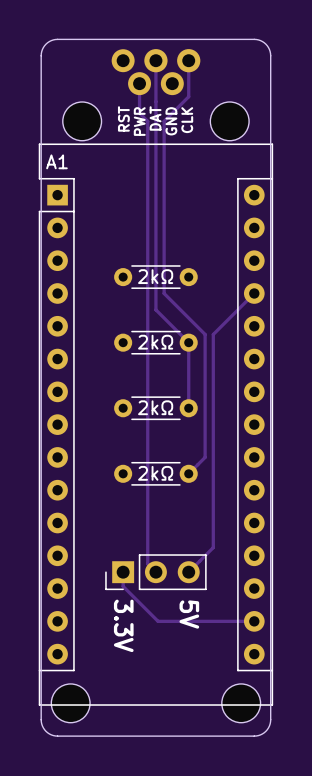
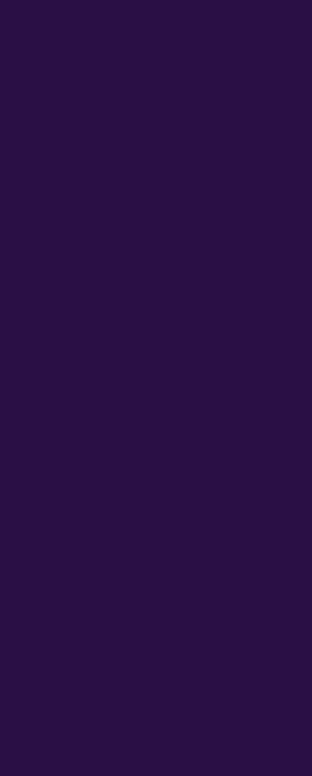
board edge: (254, 39) (57, 39) (47, 42) (41, 51) (41, 719) (44, 729) (53, 735) (254, 736) (264, 732) (270, 723) (270, 55) (265, 44) (254, 39) -> none
track: (155, 60) (155, 309) (188, 342) (188, 408) -> none
track: (188, 60) (188, 96) (164, 121) (164, 293) (205, 334) (205, 457) (188, 473) -> none
part: (156, 72) -> none
track: (139, 83) (139, 113) (147, 121) (147, 563) (155, 572) -> none
text: RST (123, 118) -> none
text: DAT (155, 118) -> none
text: CLK (187, 120) -> none
part: (82, 121) -> none
text: PWR (139, 121) -> none
text: GND (171, 121) -> none
part: (229, 121) -> none
2kΩ: (155, 277) -> none
track: (254, 293) (213, 334) (213, 547) (188, 572) -> none
2kΩ: (155, 342) -> none
2kΩ: (155, 408) -> none
A1: (155, 424) -> none
2kΩ: (155, 473) -> none
track: (123, 572) (123, 586) (158, 621) (254, 621) -> none
part: (155, 572) -> none
text: 5V (189, 614) -> none
text: 3.3V (123, 625) -> none
part: (70, 703) -> none
part: (241, 703) -> none

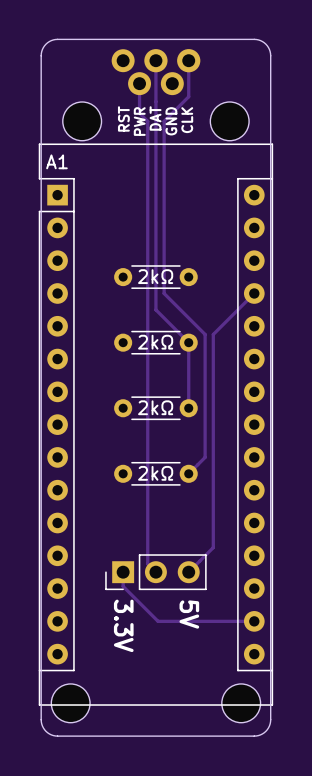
board edge: none -> (254, 39) (57, 39) (47, 42) (41, 51) (41, 719) (44, 729) (53, 735) (254, 736) (264, 732) (270, 723) (270, 55) (265, 44) (254, 39)
track: none -> (155, 60) (155, 309) (188, 342) (188, 408)
track: none -> (188, 60) (188, 96) (164, 121) (164, 293) (205, 334) (205, 457) (188, 473)
part: none -> (156, 72)
track: none -> (139, 83) (139, 113) (147, 121) (147, 563) (155, 572)
text: none -> RST (123, 118)
text: none -> DAT (155, 118)
text: none -> CLK (187, 120)
part: none -> (82, 121)
text: none -> PWR (139, 121)
text: none -> GND (171, 121)
part: none -> (229, 121)
2kΩ: none -> (155, 277)
track: none -> (254, 293) (213, 334) (213, 547) (188, 572)
2kΩ: none -> (155, 342)
2kΩ: none -> (155, 408)
A1: none -> (155, 424)
2kΩ: none -> (155, 473)
track: none -> (123, 572) (123, 586) (158, 621) (254, 621)
part: none -> (155, 572)
text: none -> 5V (189, 614)
text: none -> 3.3V (123, 625)
part: none -> (70, 703)
part: none -> (241, 703)

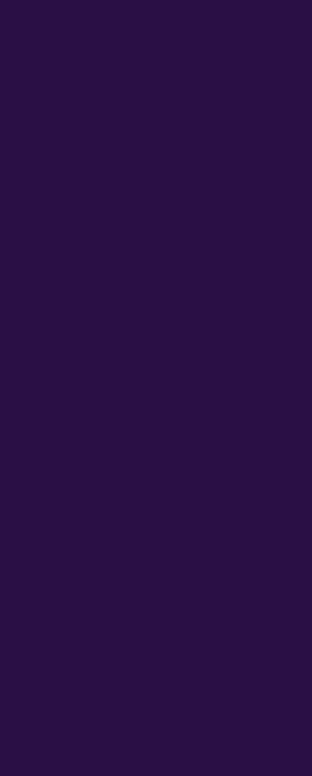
board edge: (254, 39) (57, 39) (47, 42) (41, 51) (41, 719) (44, 729) (53, 735) (254, 736) (264, 732) (270, 723) (270, 55) (265, 44) (254, 39) -> none
track: (155, 60) (155, 309) (188, 342) (188, 408) -> none
track: (188, 60) (188, 96) (164, 121) (164, 293) (205, 334) (205, 457) (188, 473) -> none
part: (156, 72) -> none
track: (139, 83) (139, 113) (147, 121) (147, 563) (155, 572) -> none
text: RST (123, 118) -> none
text: DAT (155, 118) -> none
text: CLK (187, 120) -> none
part: (82, 121) -> none
text: PWR (139, 121) -> none
text: GND (171, 121) -> none
part: (229, 121) -> none
2kΩ: (155, 277) -> none
track: (254, 293) (213, 334) (213, 547) (188, 572) -> none
2kΩ: (155, 342) -> none
2kΩ: (155, 408) -> none
A1: (155, 424) -> none
2kΩ: (155, 473) -> none
track: (123, 572) (123, 586) (158, 621) (254, 621) -> none
part: (155, 572) -> none
text: 5V (189, 614) -> none
text: 3.3V (123, 625) -> none
part: (70, 703) -> none
part: (241, 703) -> none

